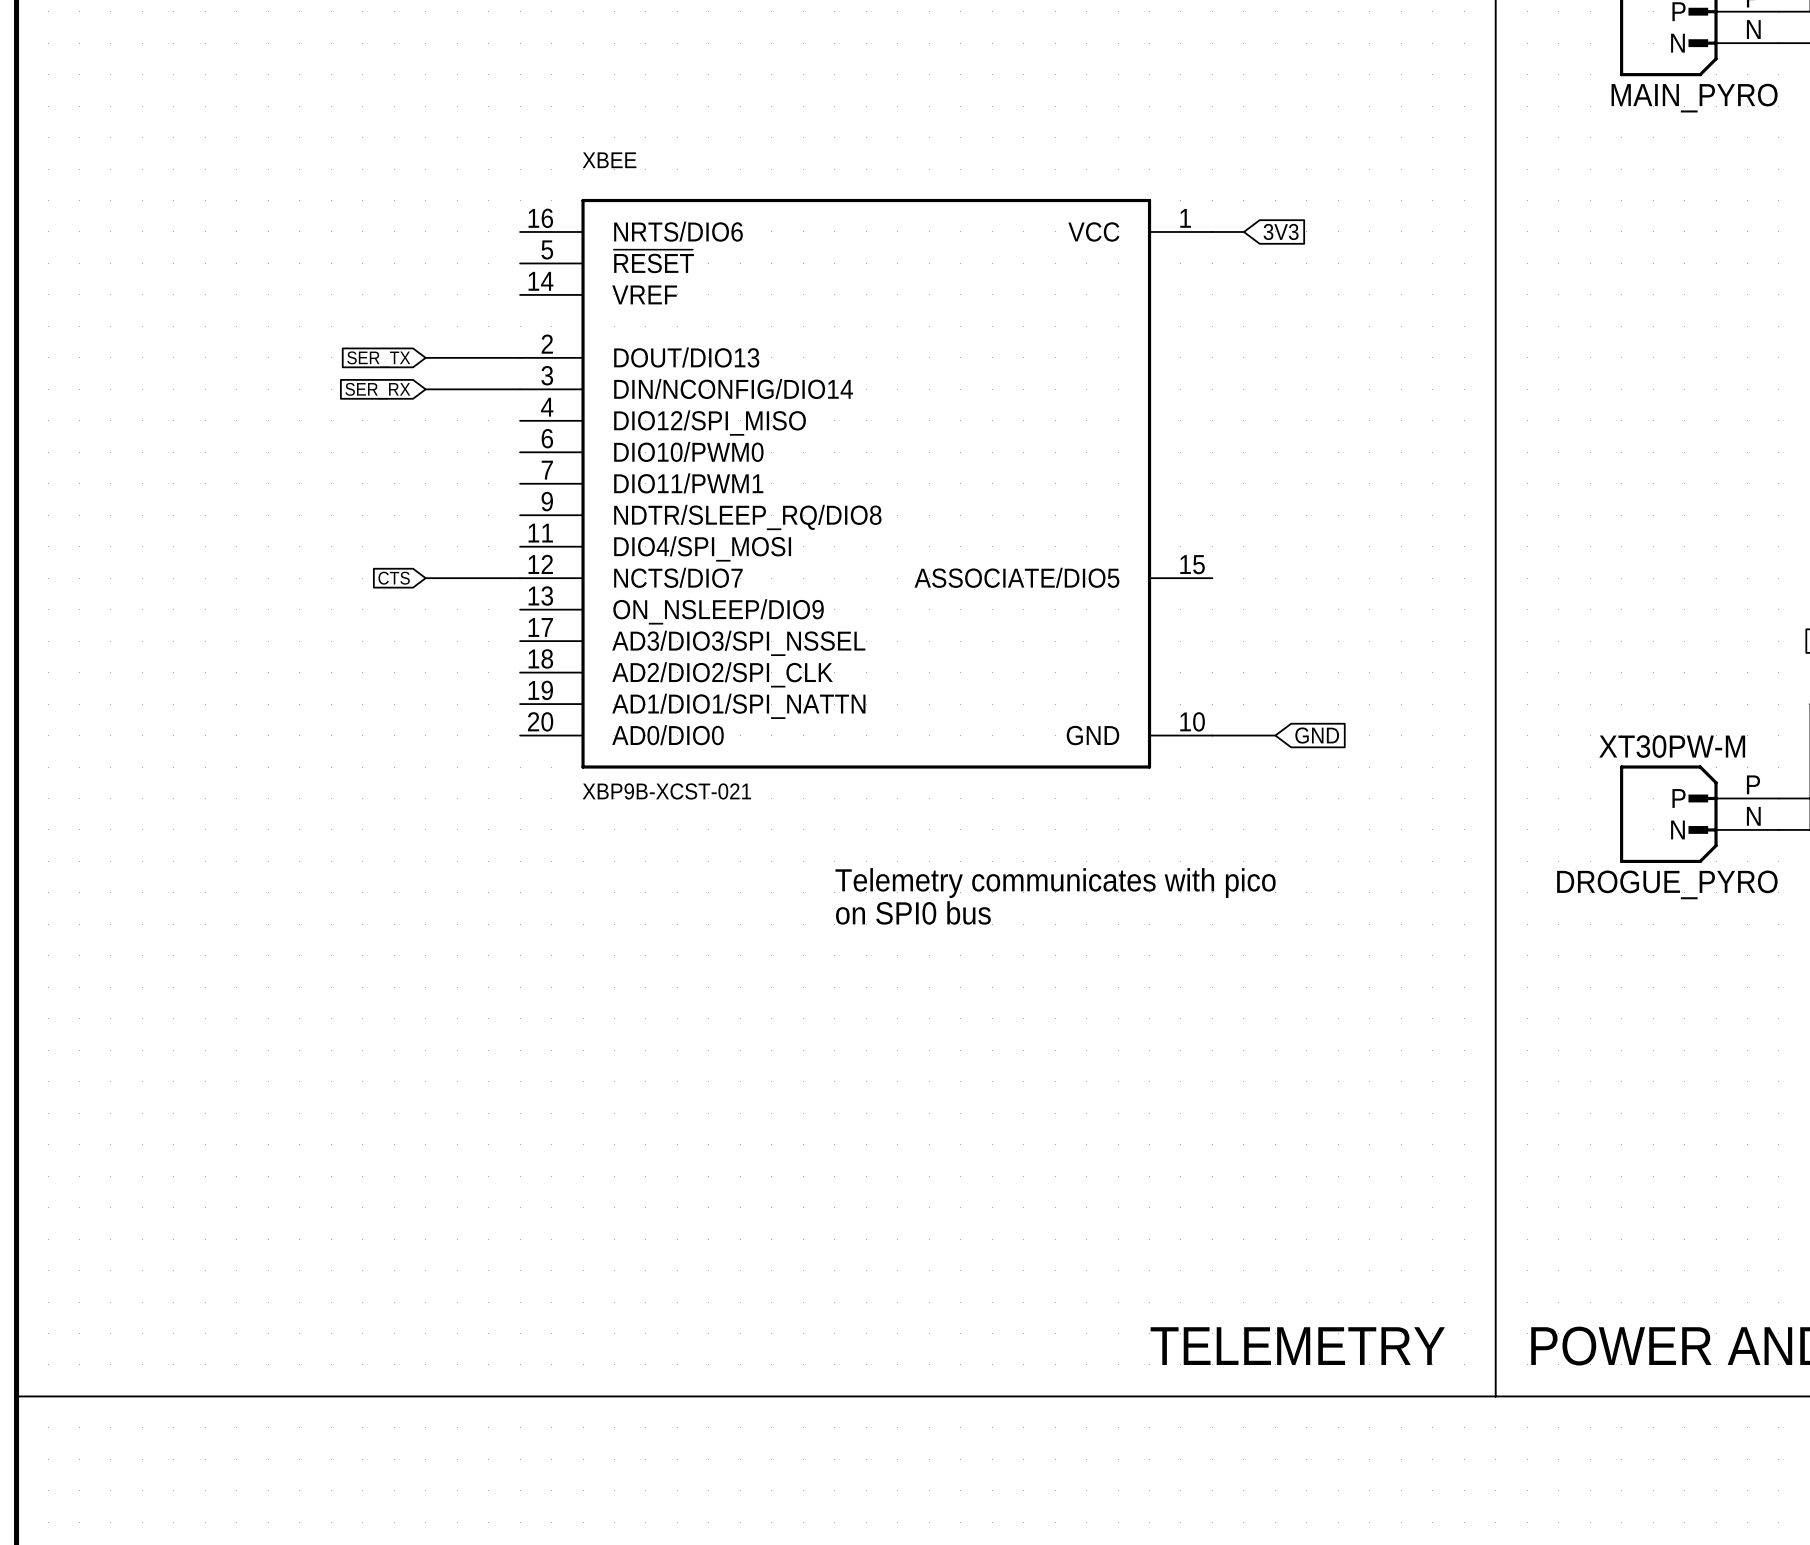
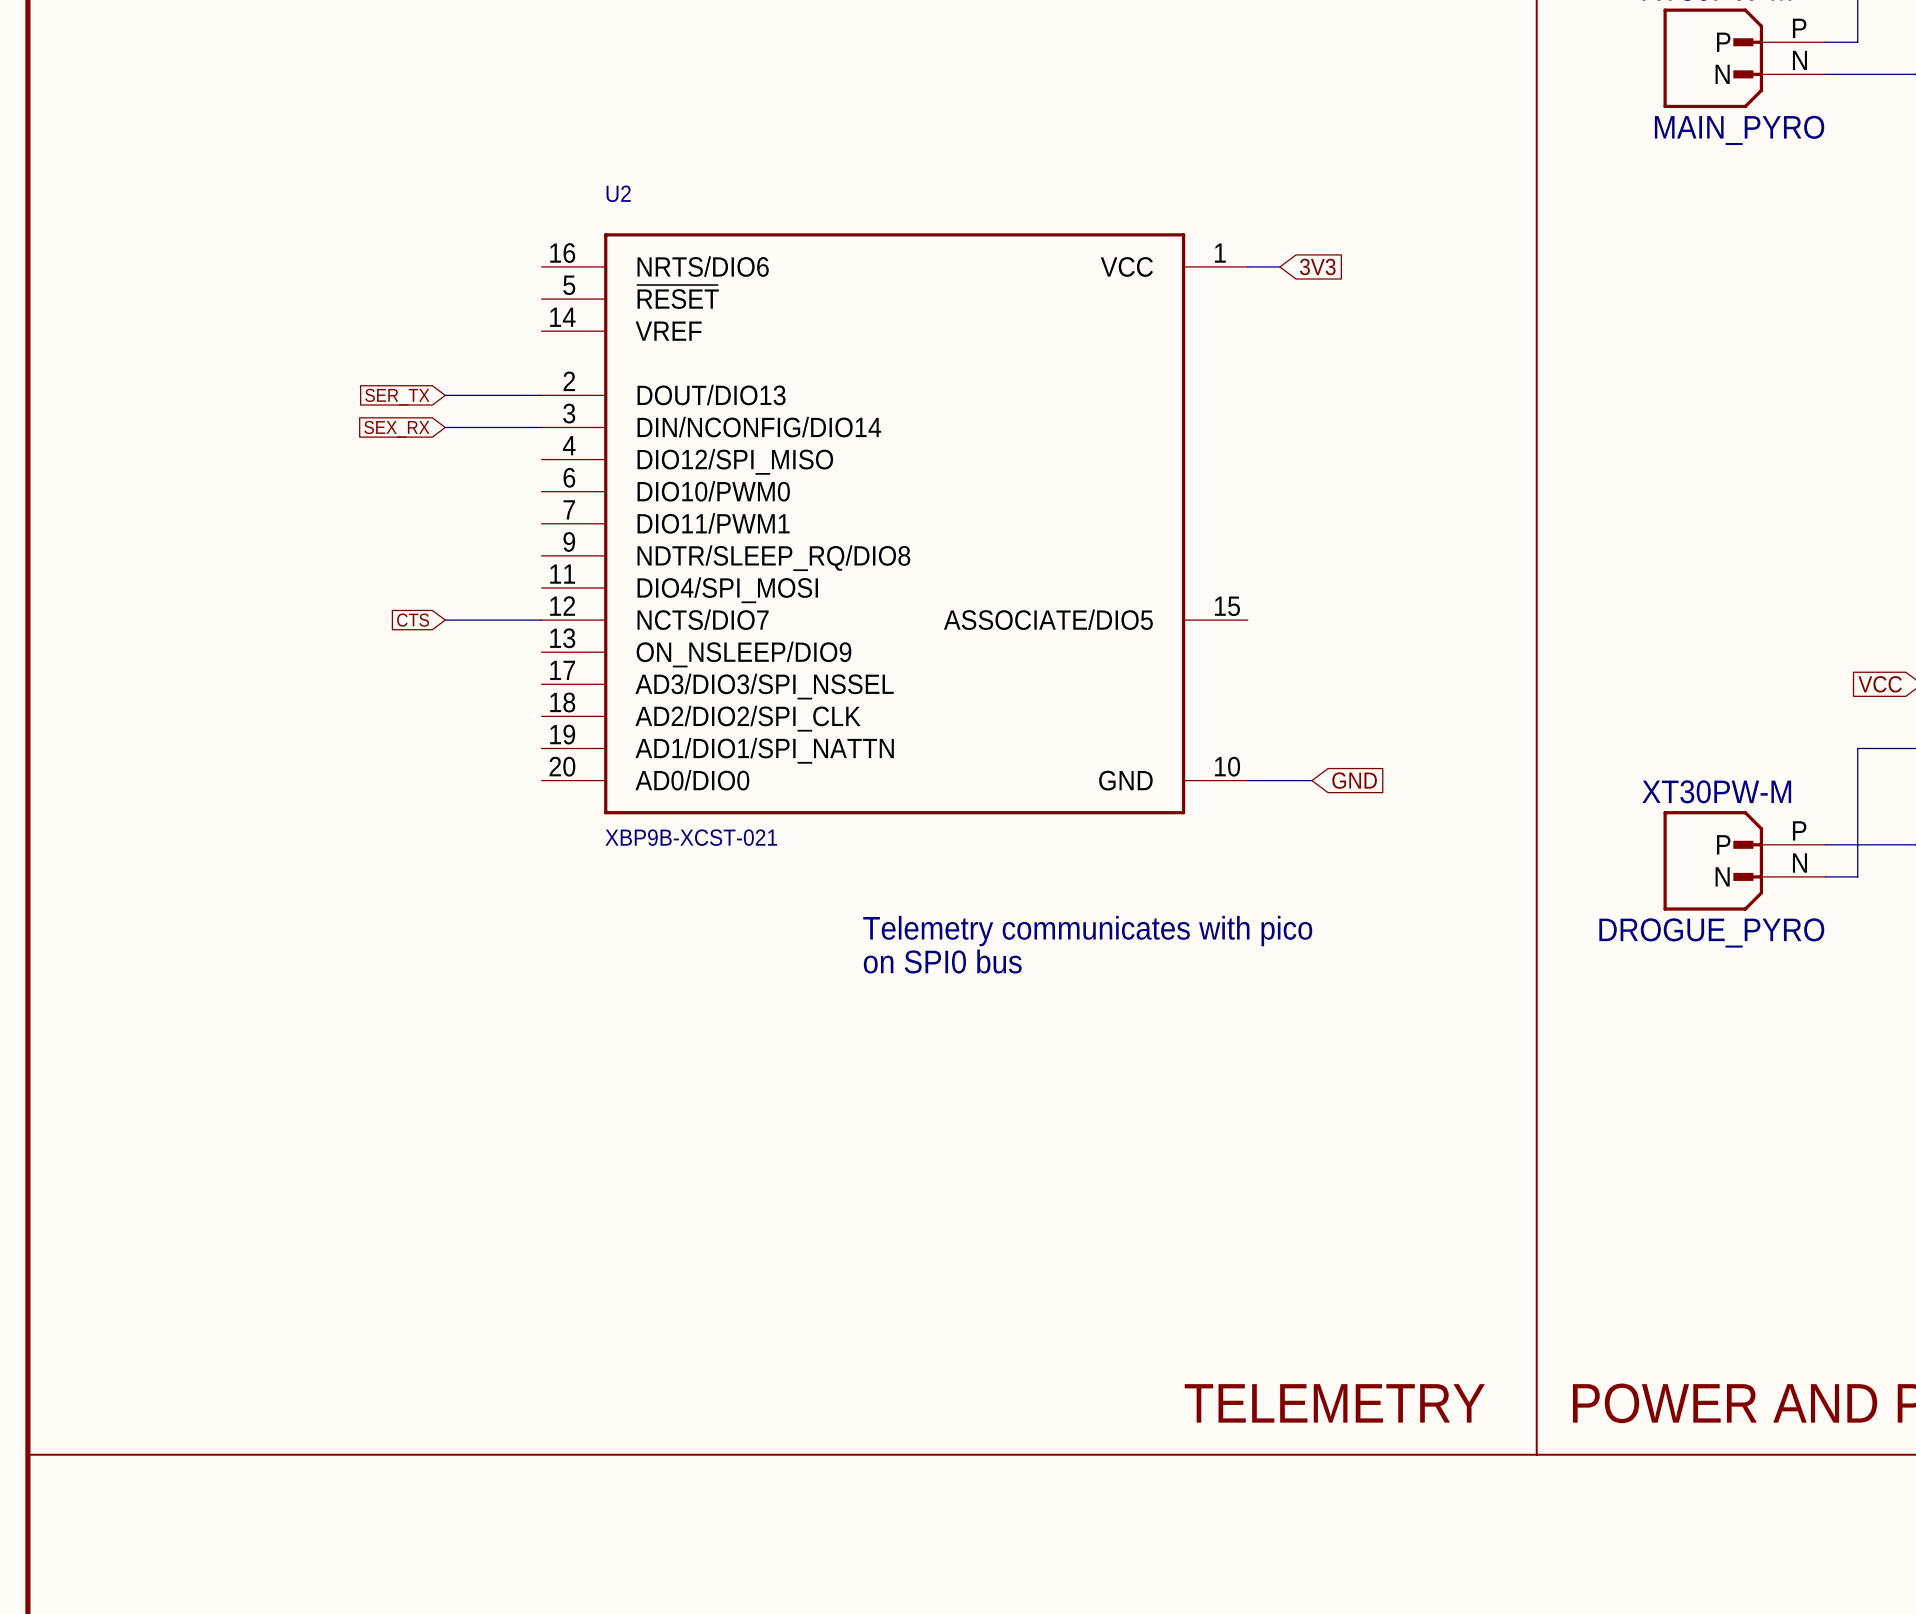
XBEE name: XBEE (609, 160) -> U2 (618, 193)
global label: SER_RX (377, 391) -> SEX_RX (396, 429)

